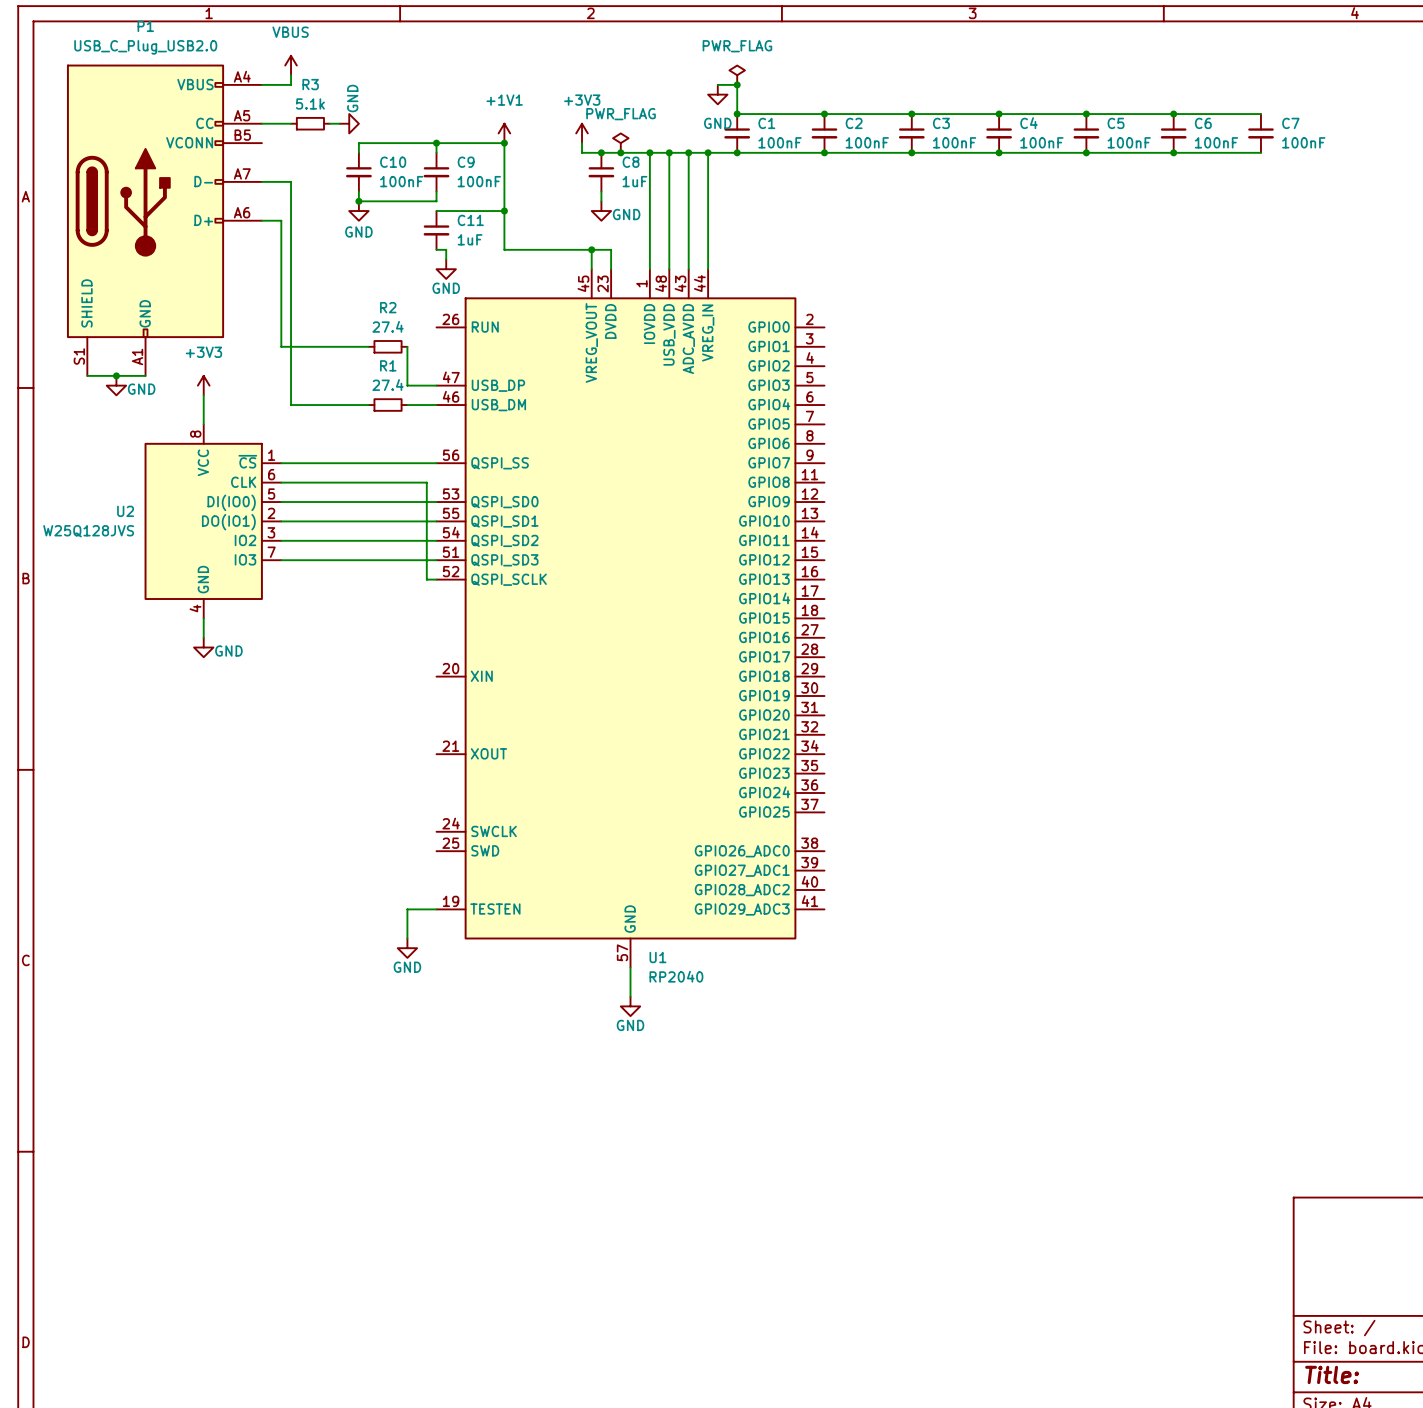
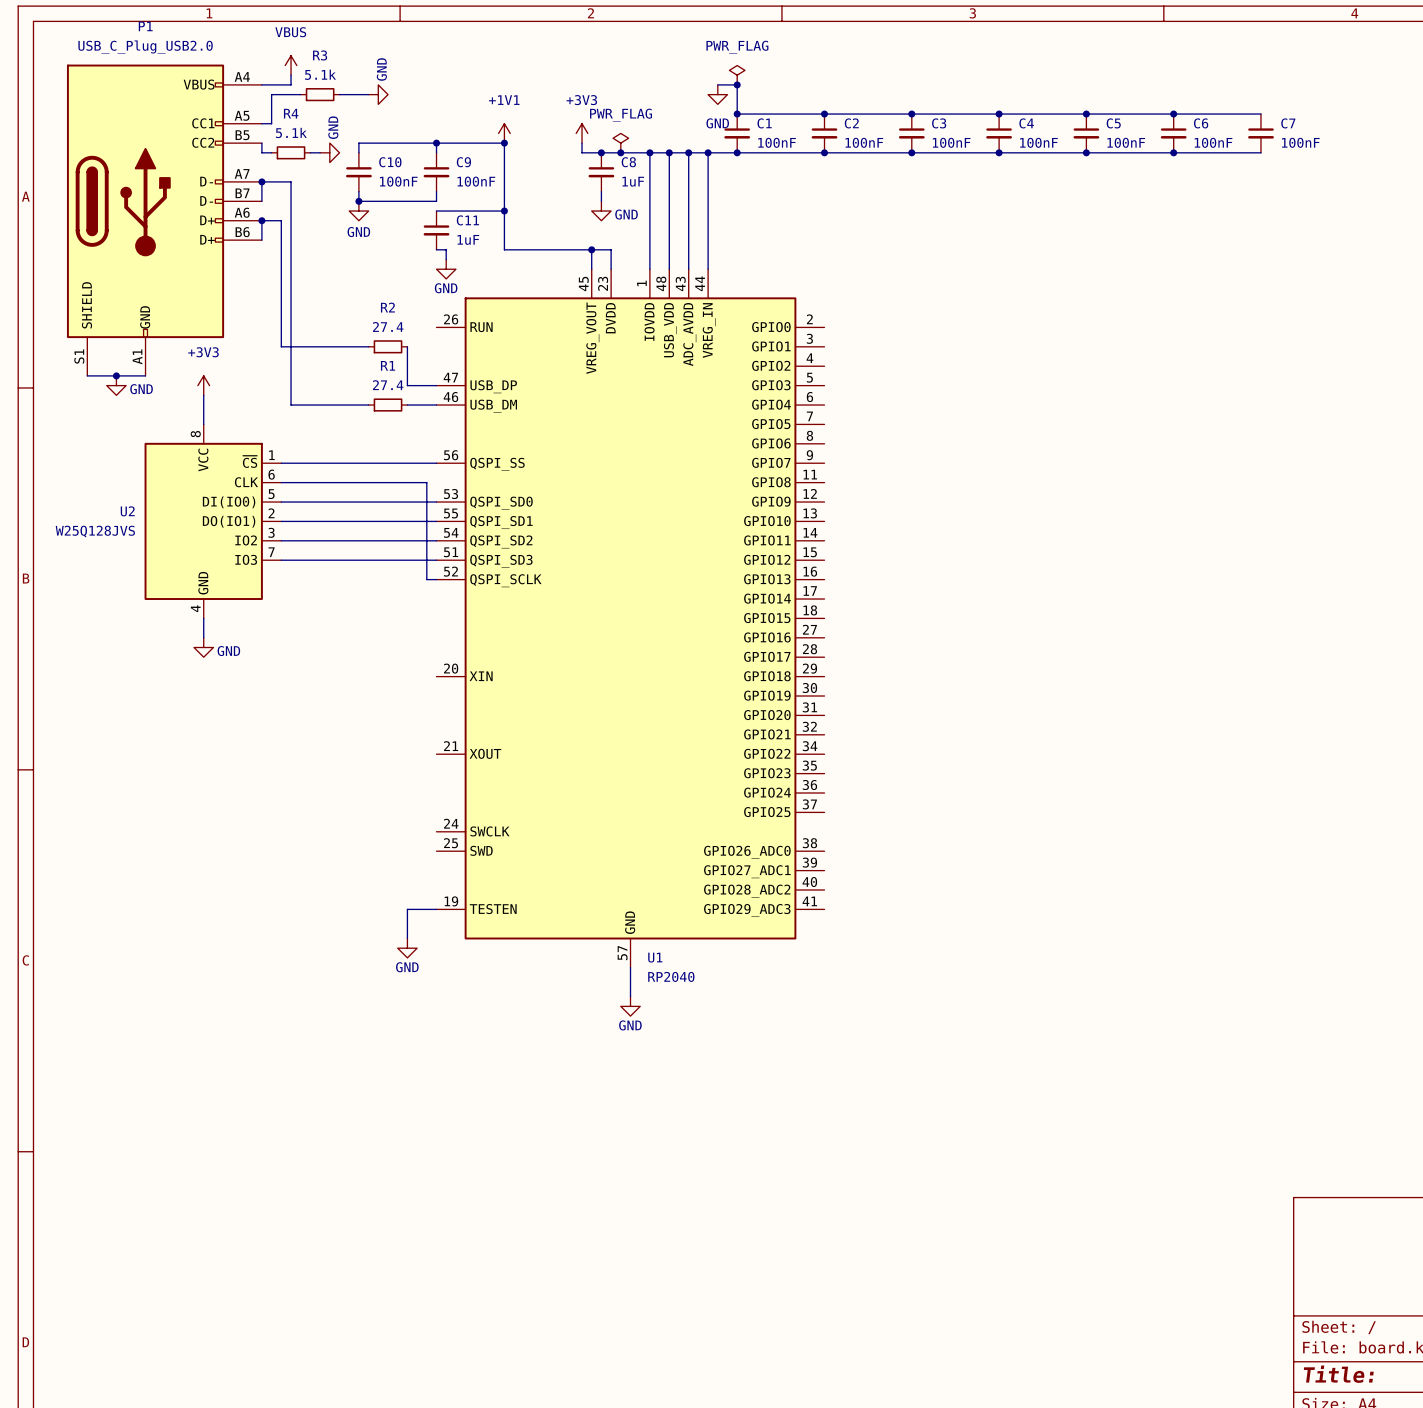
P1 symbol: [66, 64, 262, 376] -> [66, 64, 262, 376]
wire: none -> (339, 94) (368, 94)
power symbol: none -> GND (378, 94)
wire: (271, 123) (291, 123) -> (271, 123) (271, 94) (300, 94)
R3 position: (310, 123) -> (320, 94)
wire: (329, 123) (339, 123) -> (310, 152) (320, 152)
power symbol: GND (349, 123) -> none
wire: none -> (261, 143) (261, 152) (271, 152)
R4: none -> 5.1k (291, 152)
power symbol: none -> GND (329, 152)
wire: none -> (261, 181) (261, 201)
junction: none -> (261, 181)
wire: none -> (261, 220) (261, 240)
junction: none -> (261, 220)

